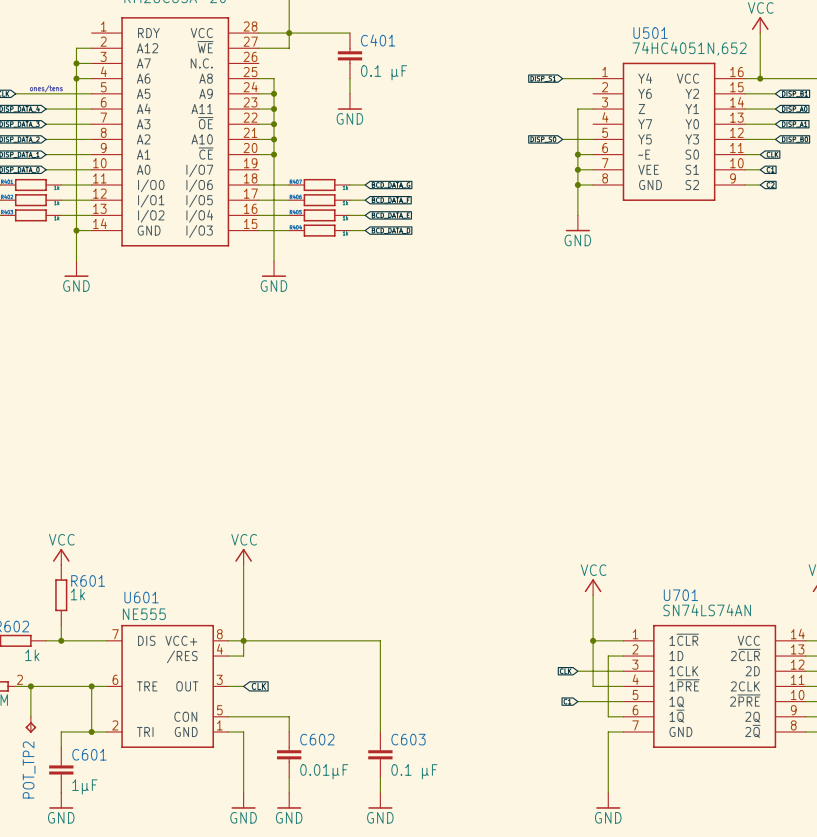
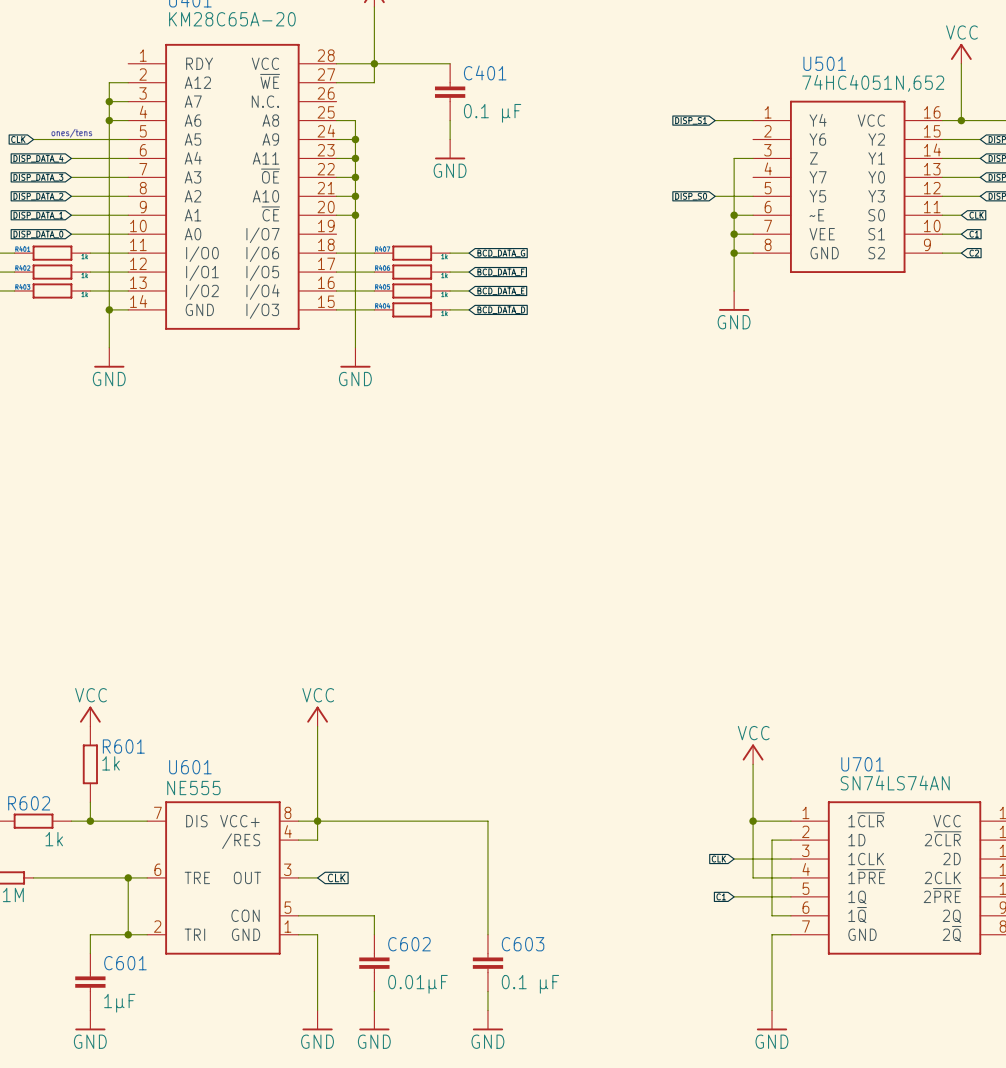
part pin number: 2 (19, 679) -> none
wire: (30, 686) (30, 716) -> none
junction: (30, 686) -> none
POT_TP2: (30, 724) -> none

